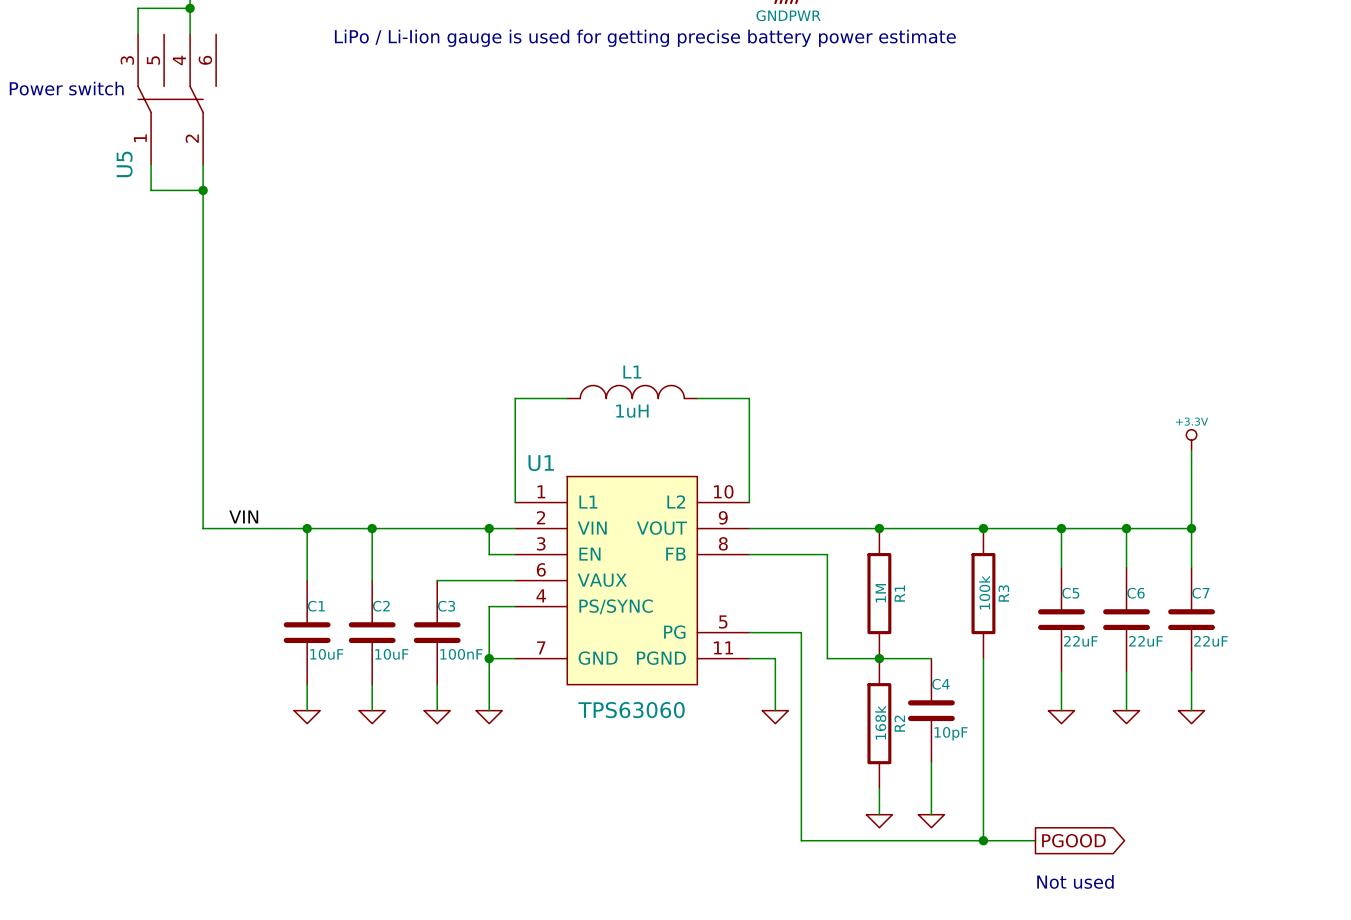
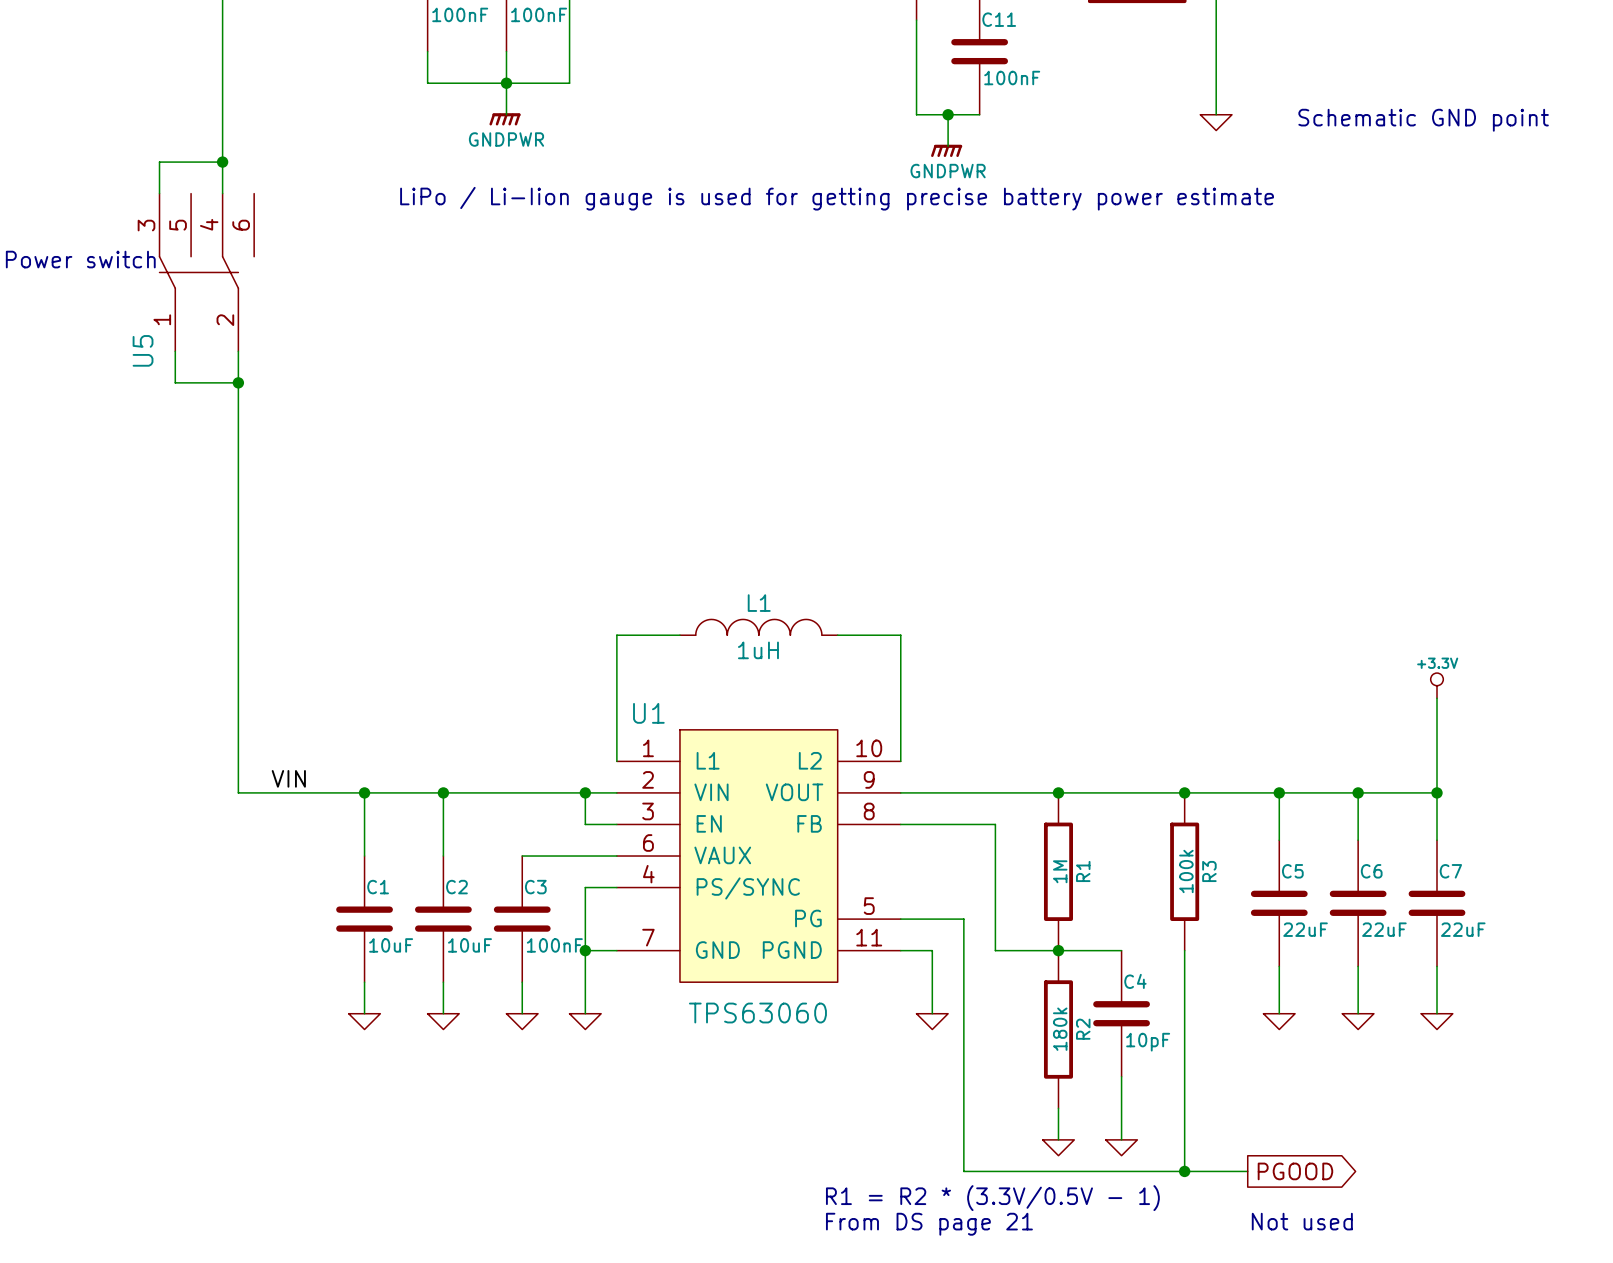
R2 value: 168k (880, 722) -> 180k (1060, 1029)
text: none -> R1 = R2 * (3.3V/0.5V - 1) (992, 1198)
text: none -> From DS page 21 (929, 1224)

